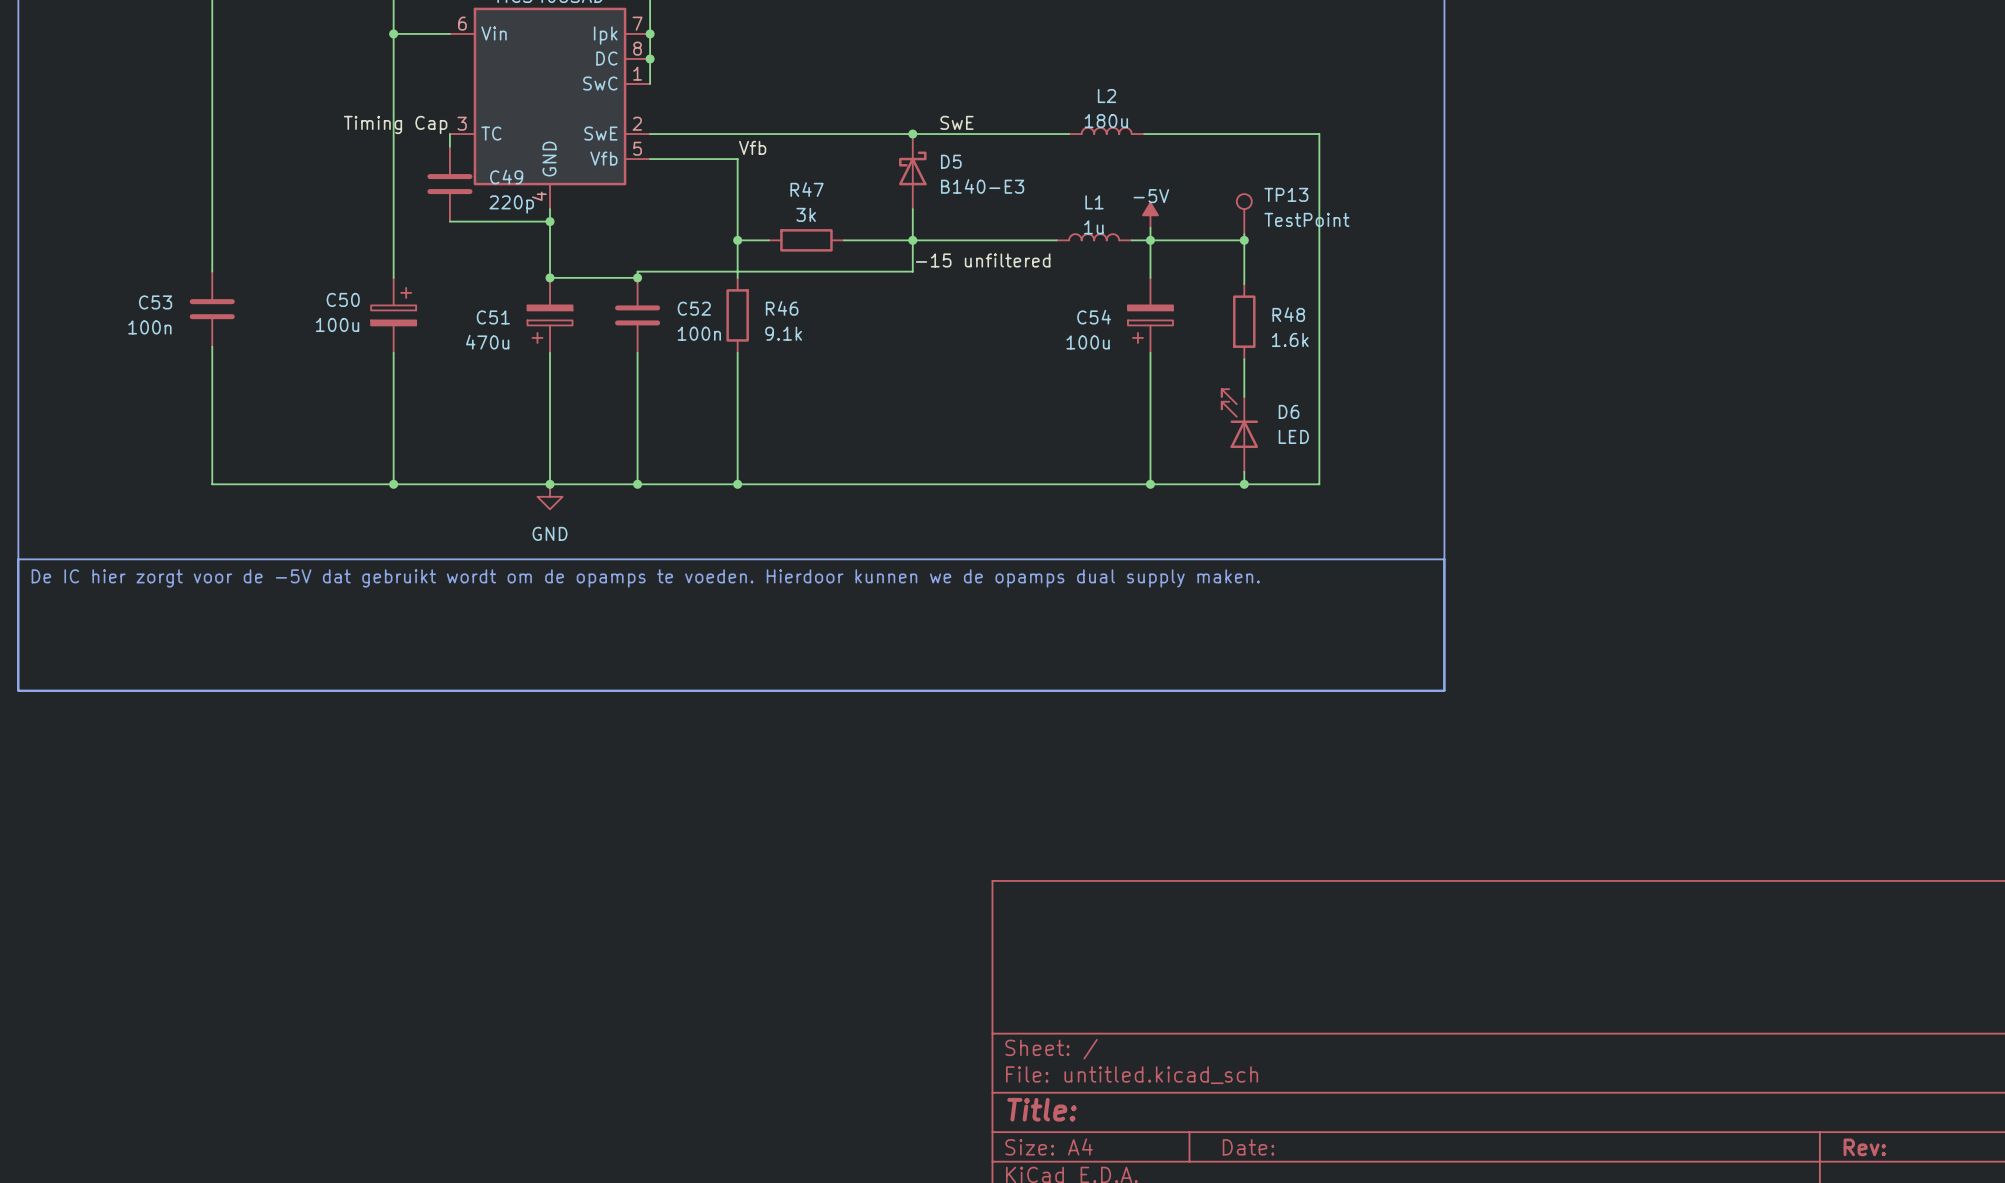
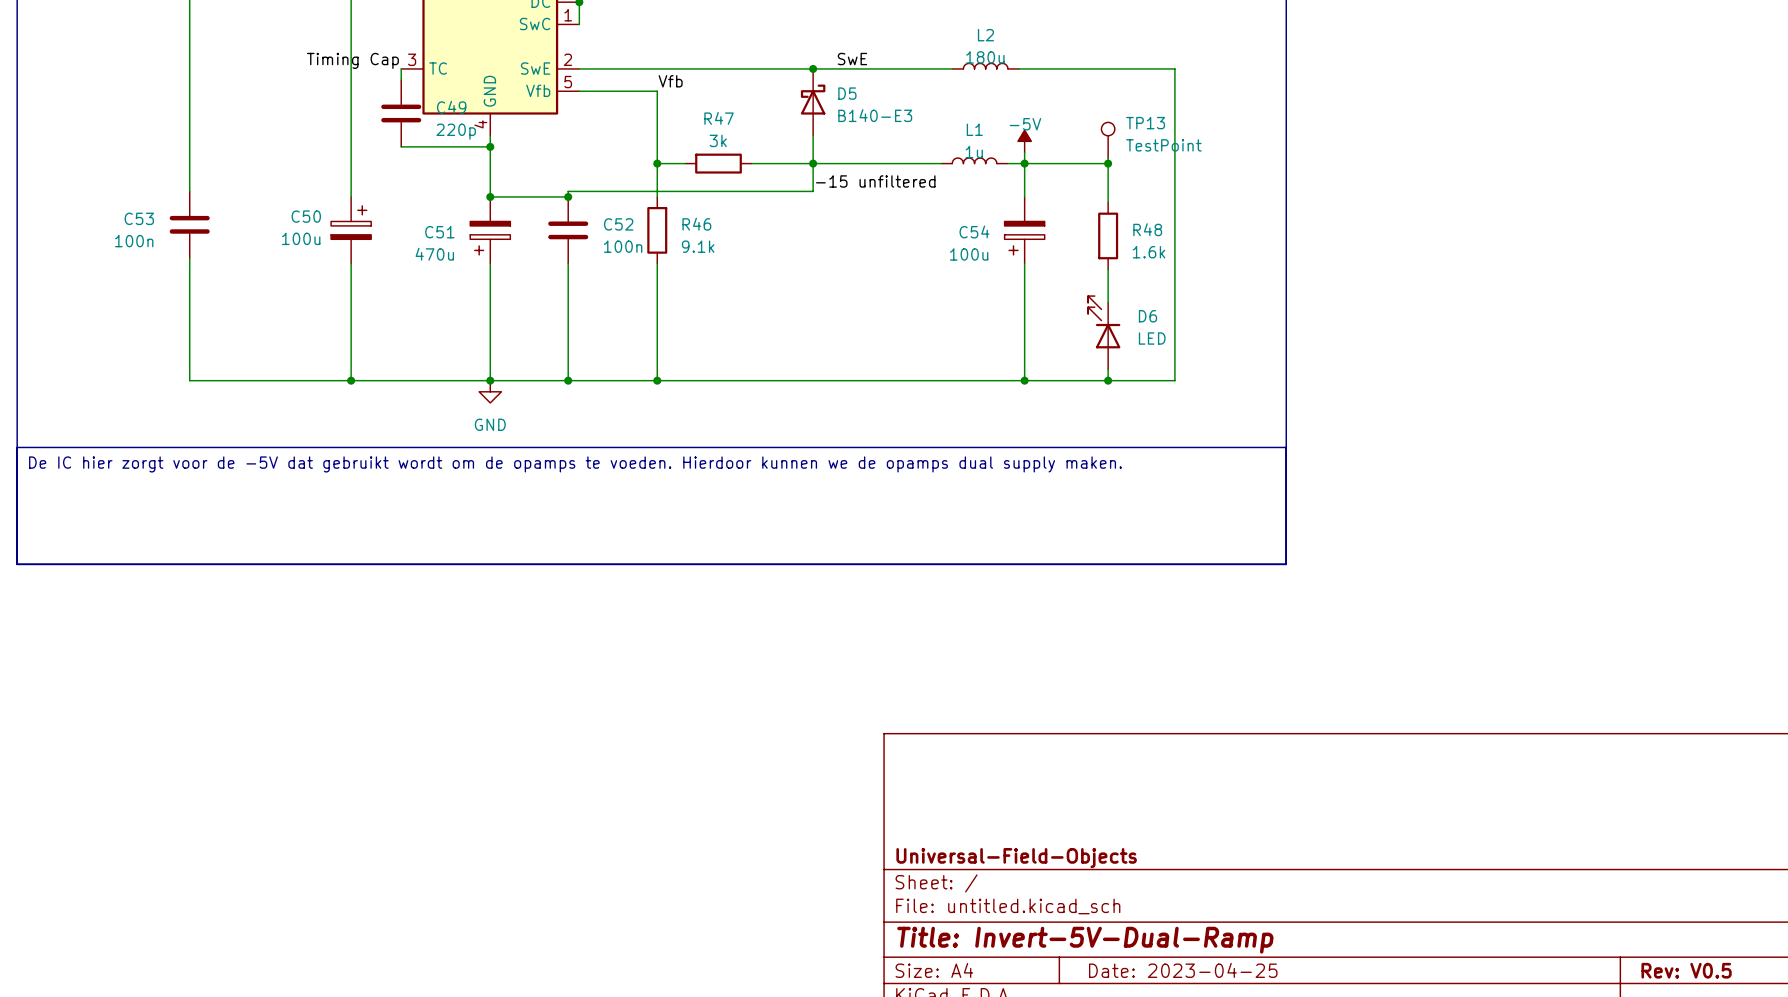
title block: none -> Universal-Field-Objects (1016, 858)
title block: Title: (1042, 1109) -> Title: Invert-5V-Dual-Ramp (1085, 940)
title block: Date: (1248, 1147) -> Date: 2023-04-25 (1183, 970)
title block: Rev: (1864, 1147) -> Rev: V0.5 (1686, 970)

